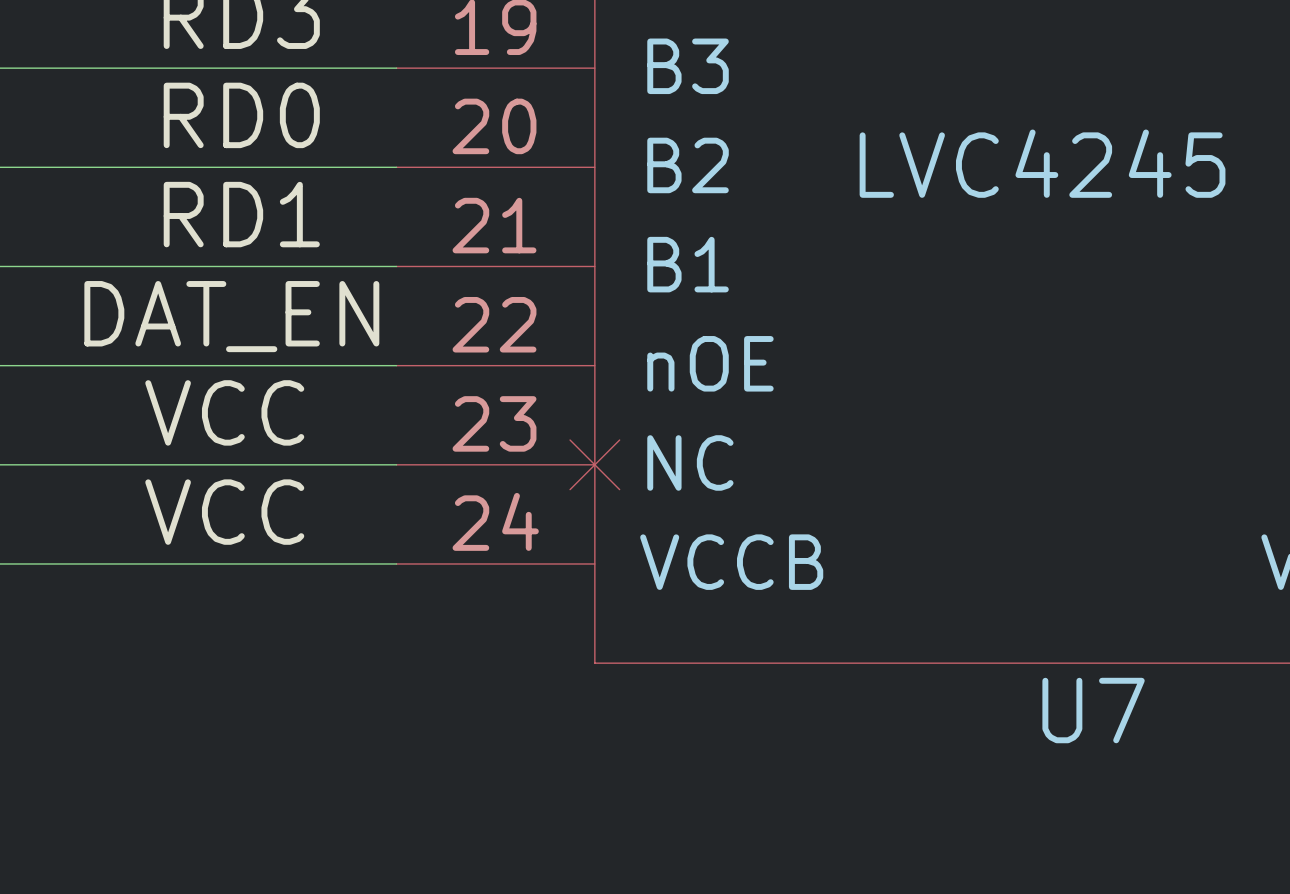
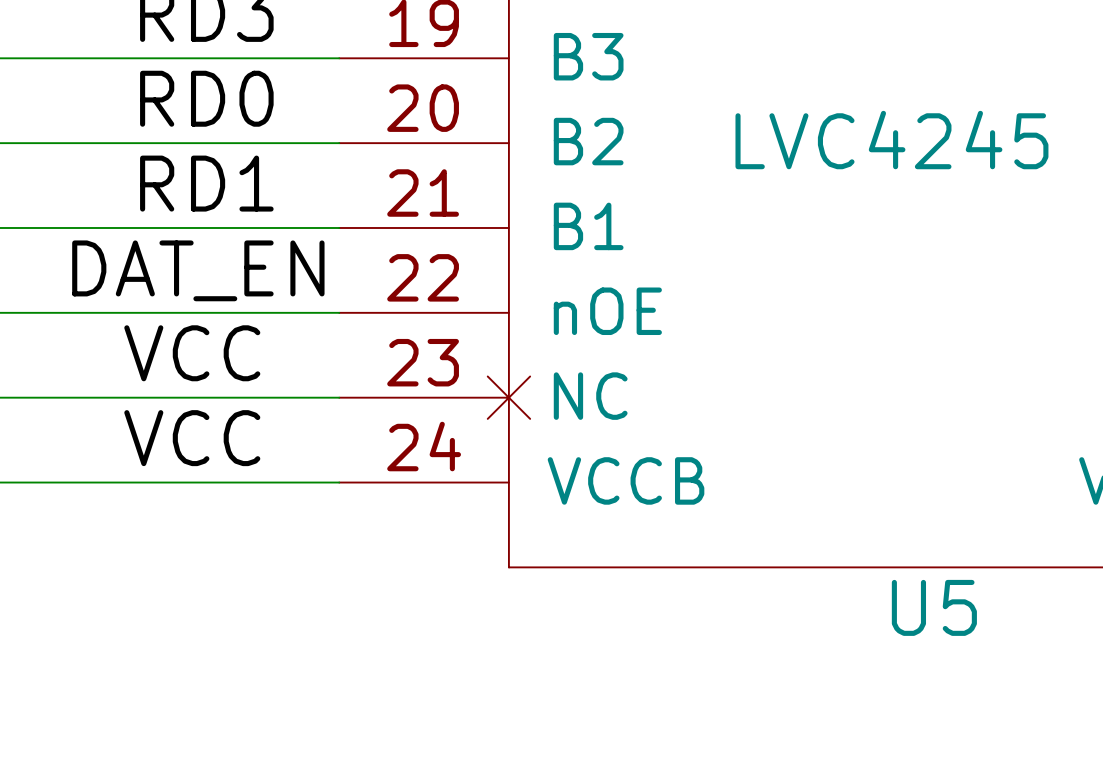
U7 name: U7 (1093, 710) -> U5 (934, 607)

